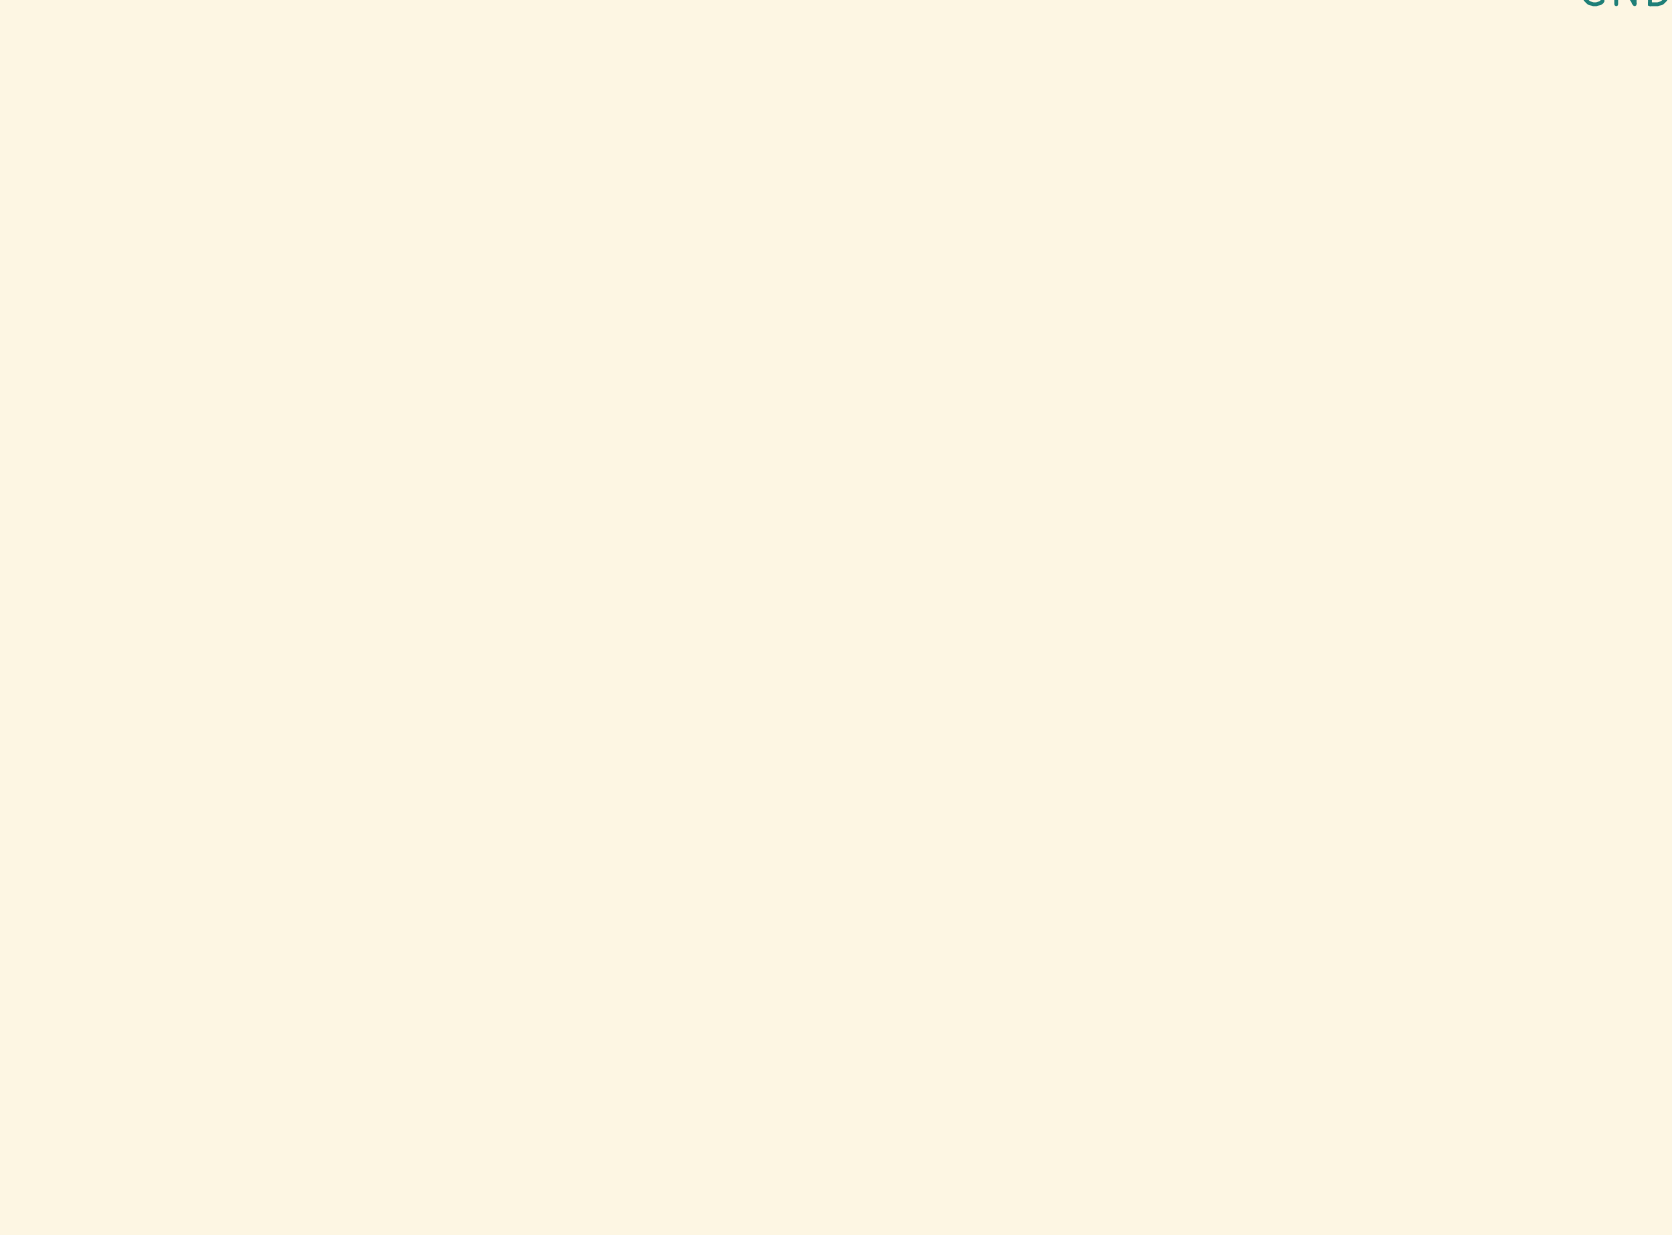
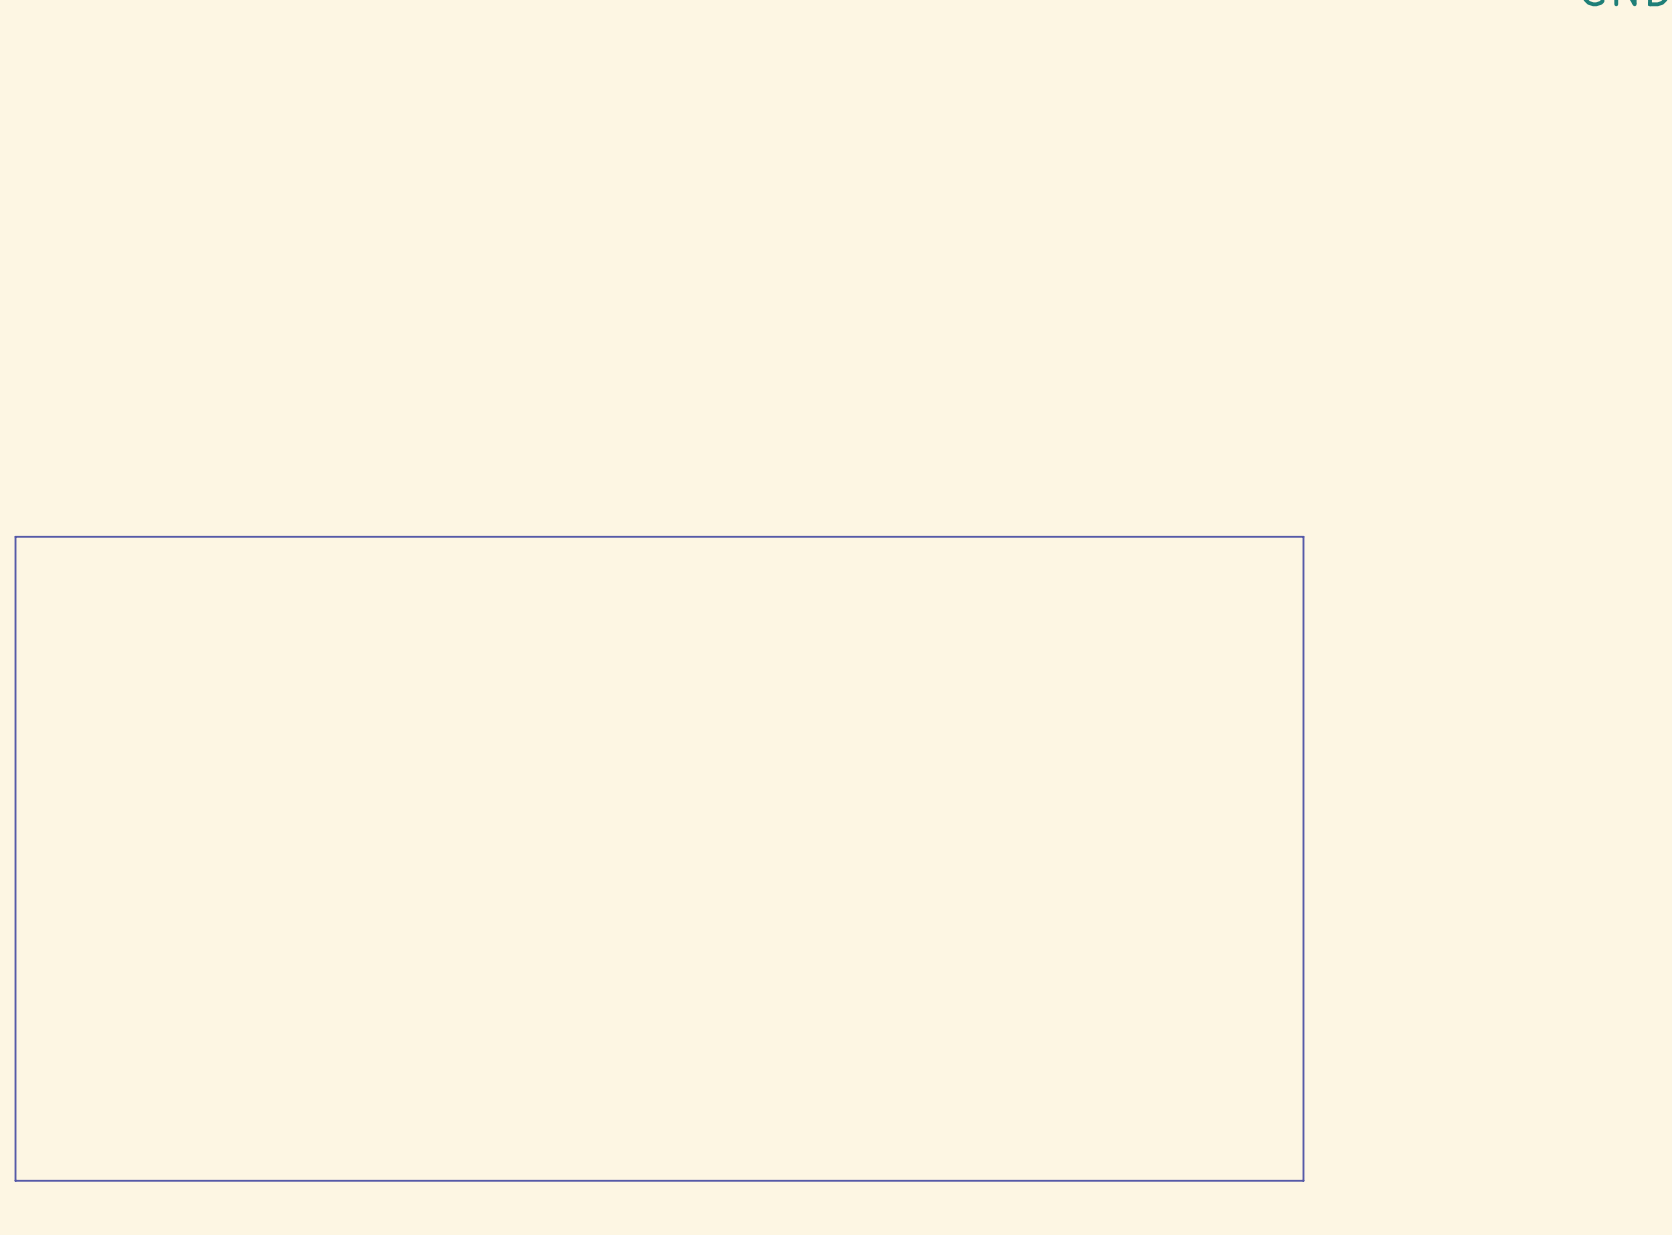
line: none -> (15, 536) (1303, 536) (1303, 1180) (15, 1180) (15, 536)

